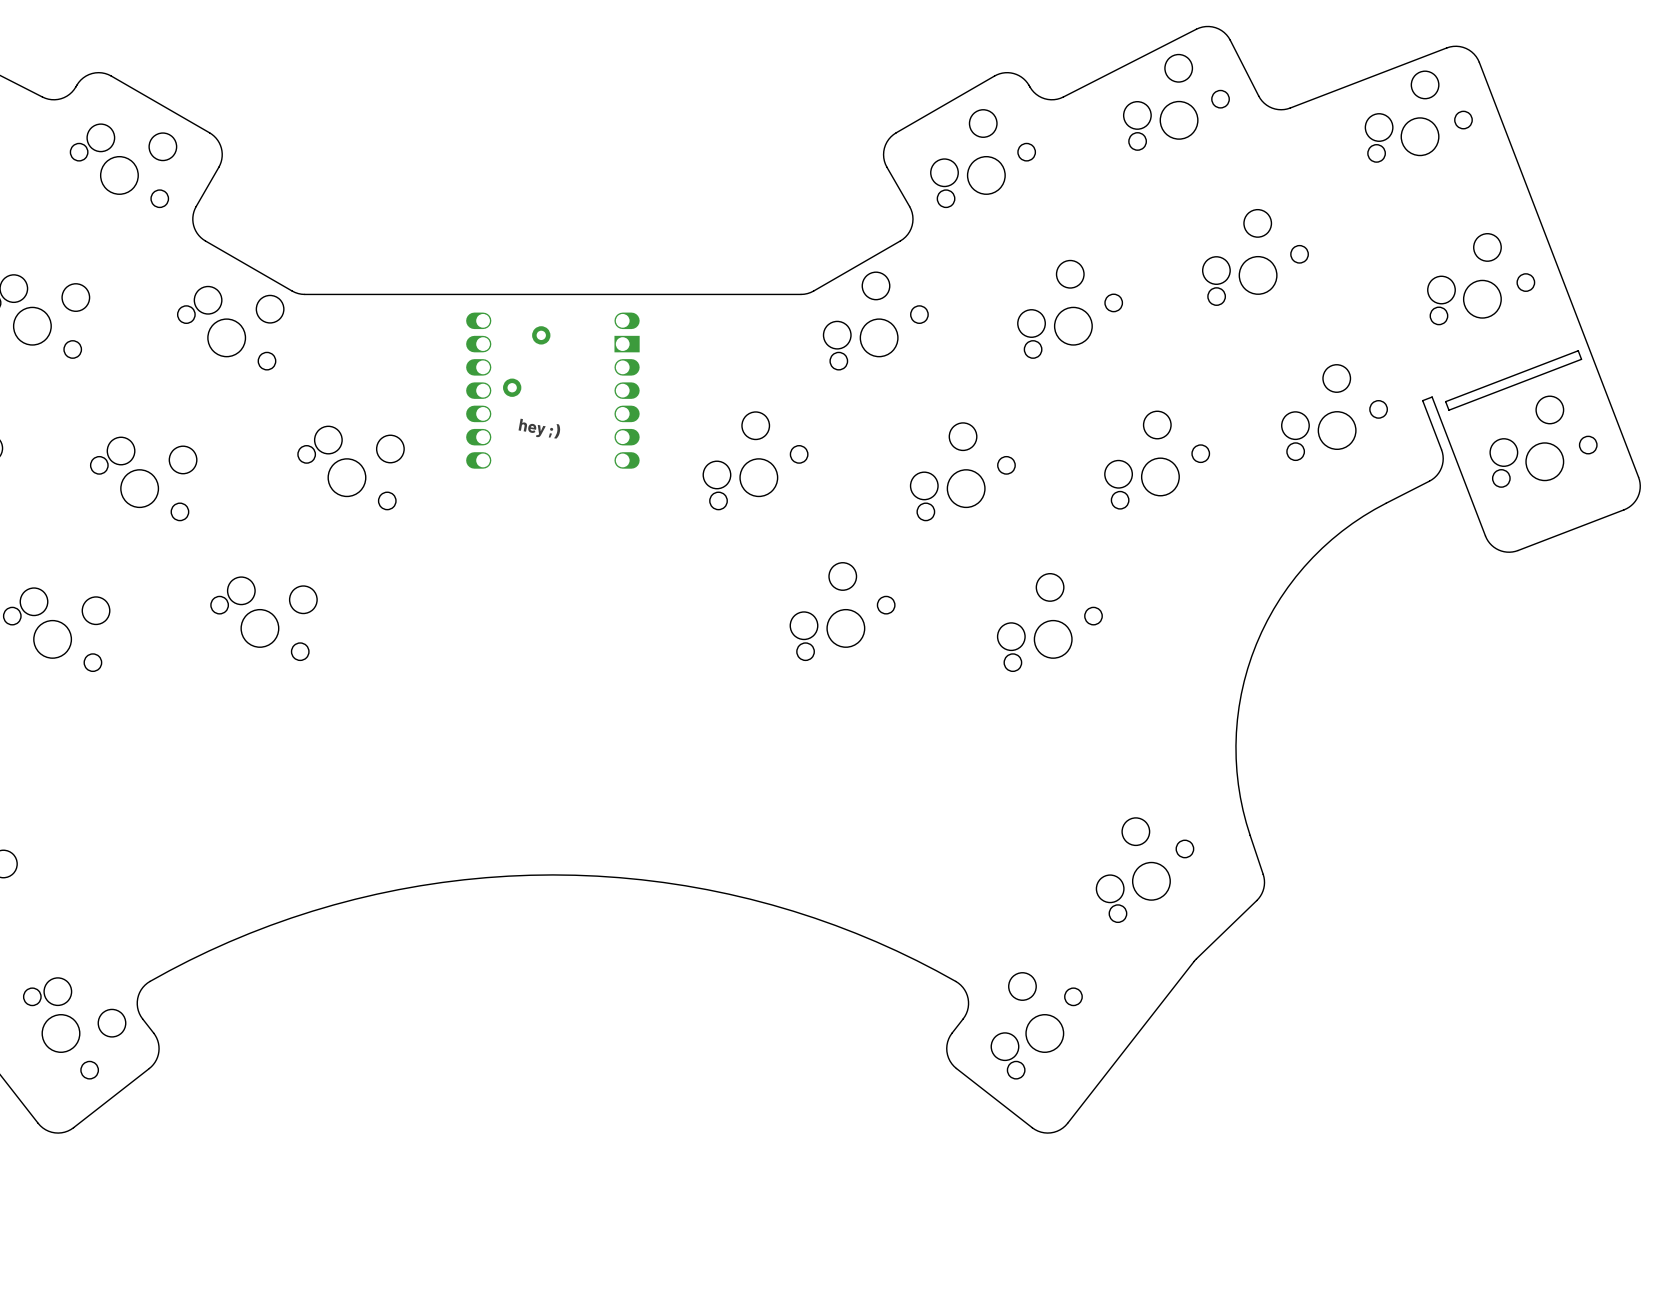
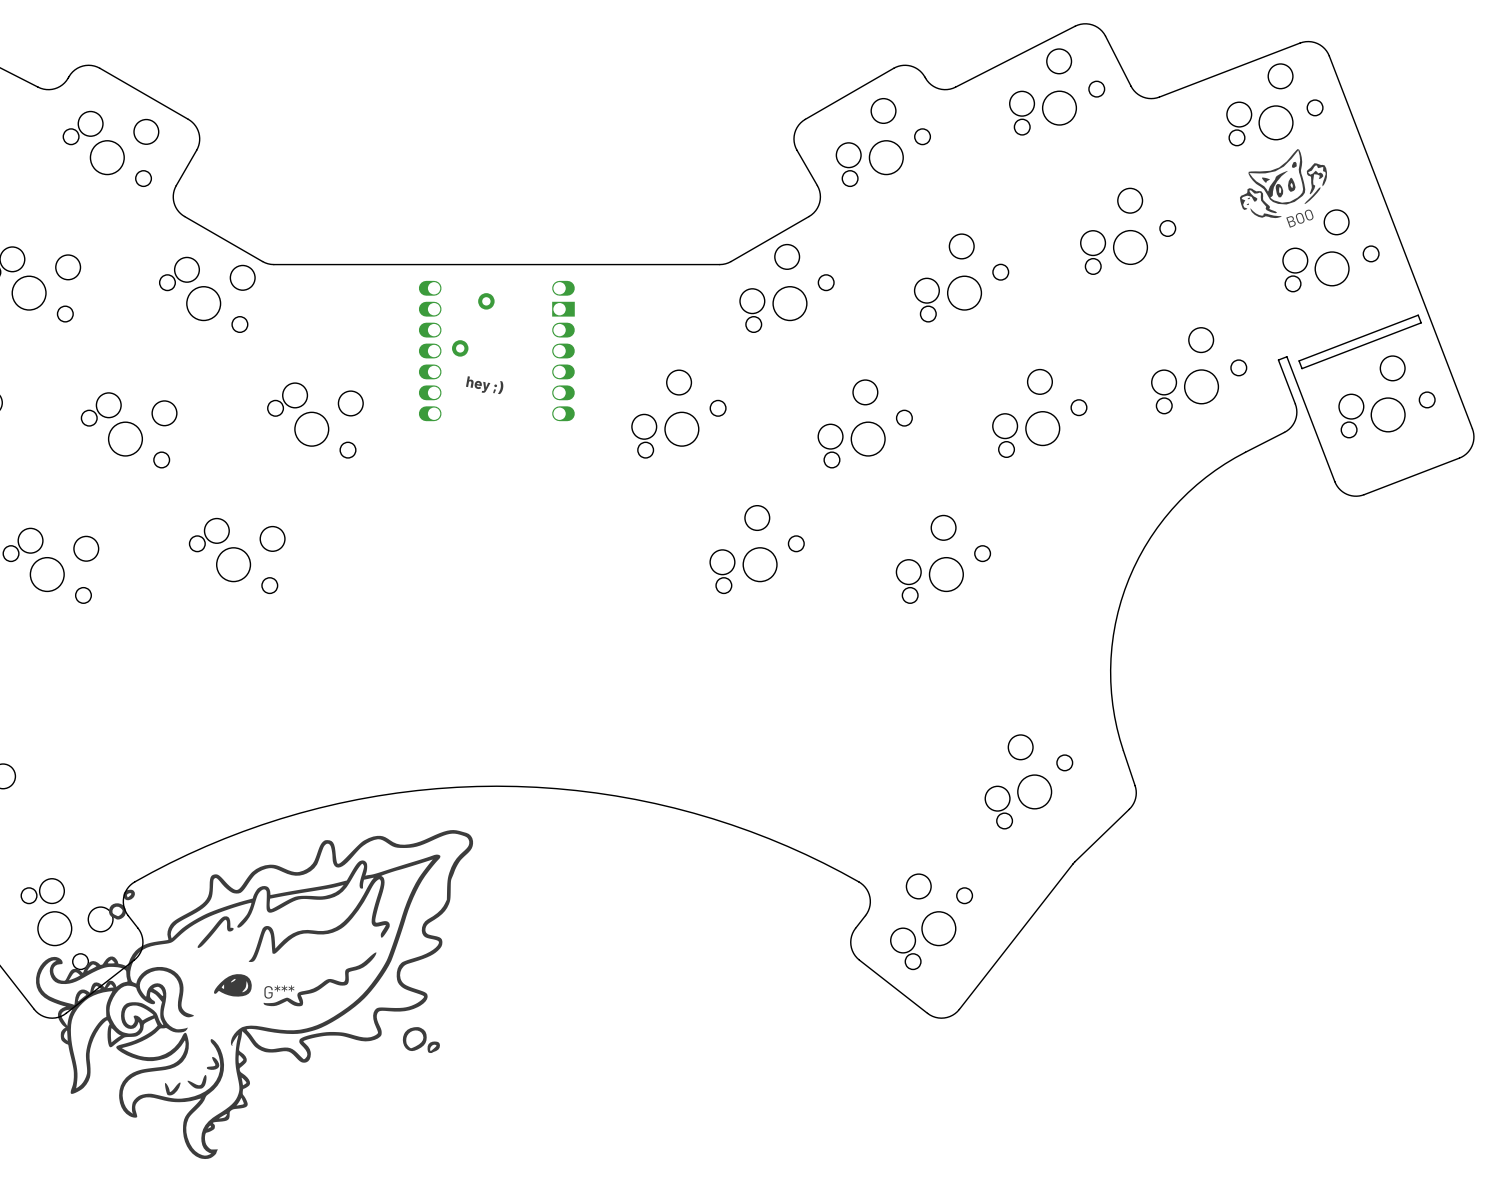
drawing: none -> [1239, 149, 1327, 219]
text: none -> BOO (1299, 218)
G***: none -> (254, 994)

